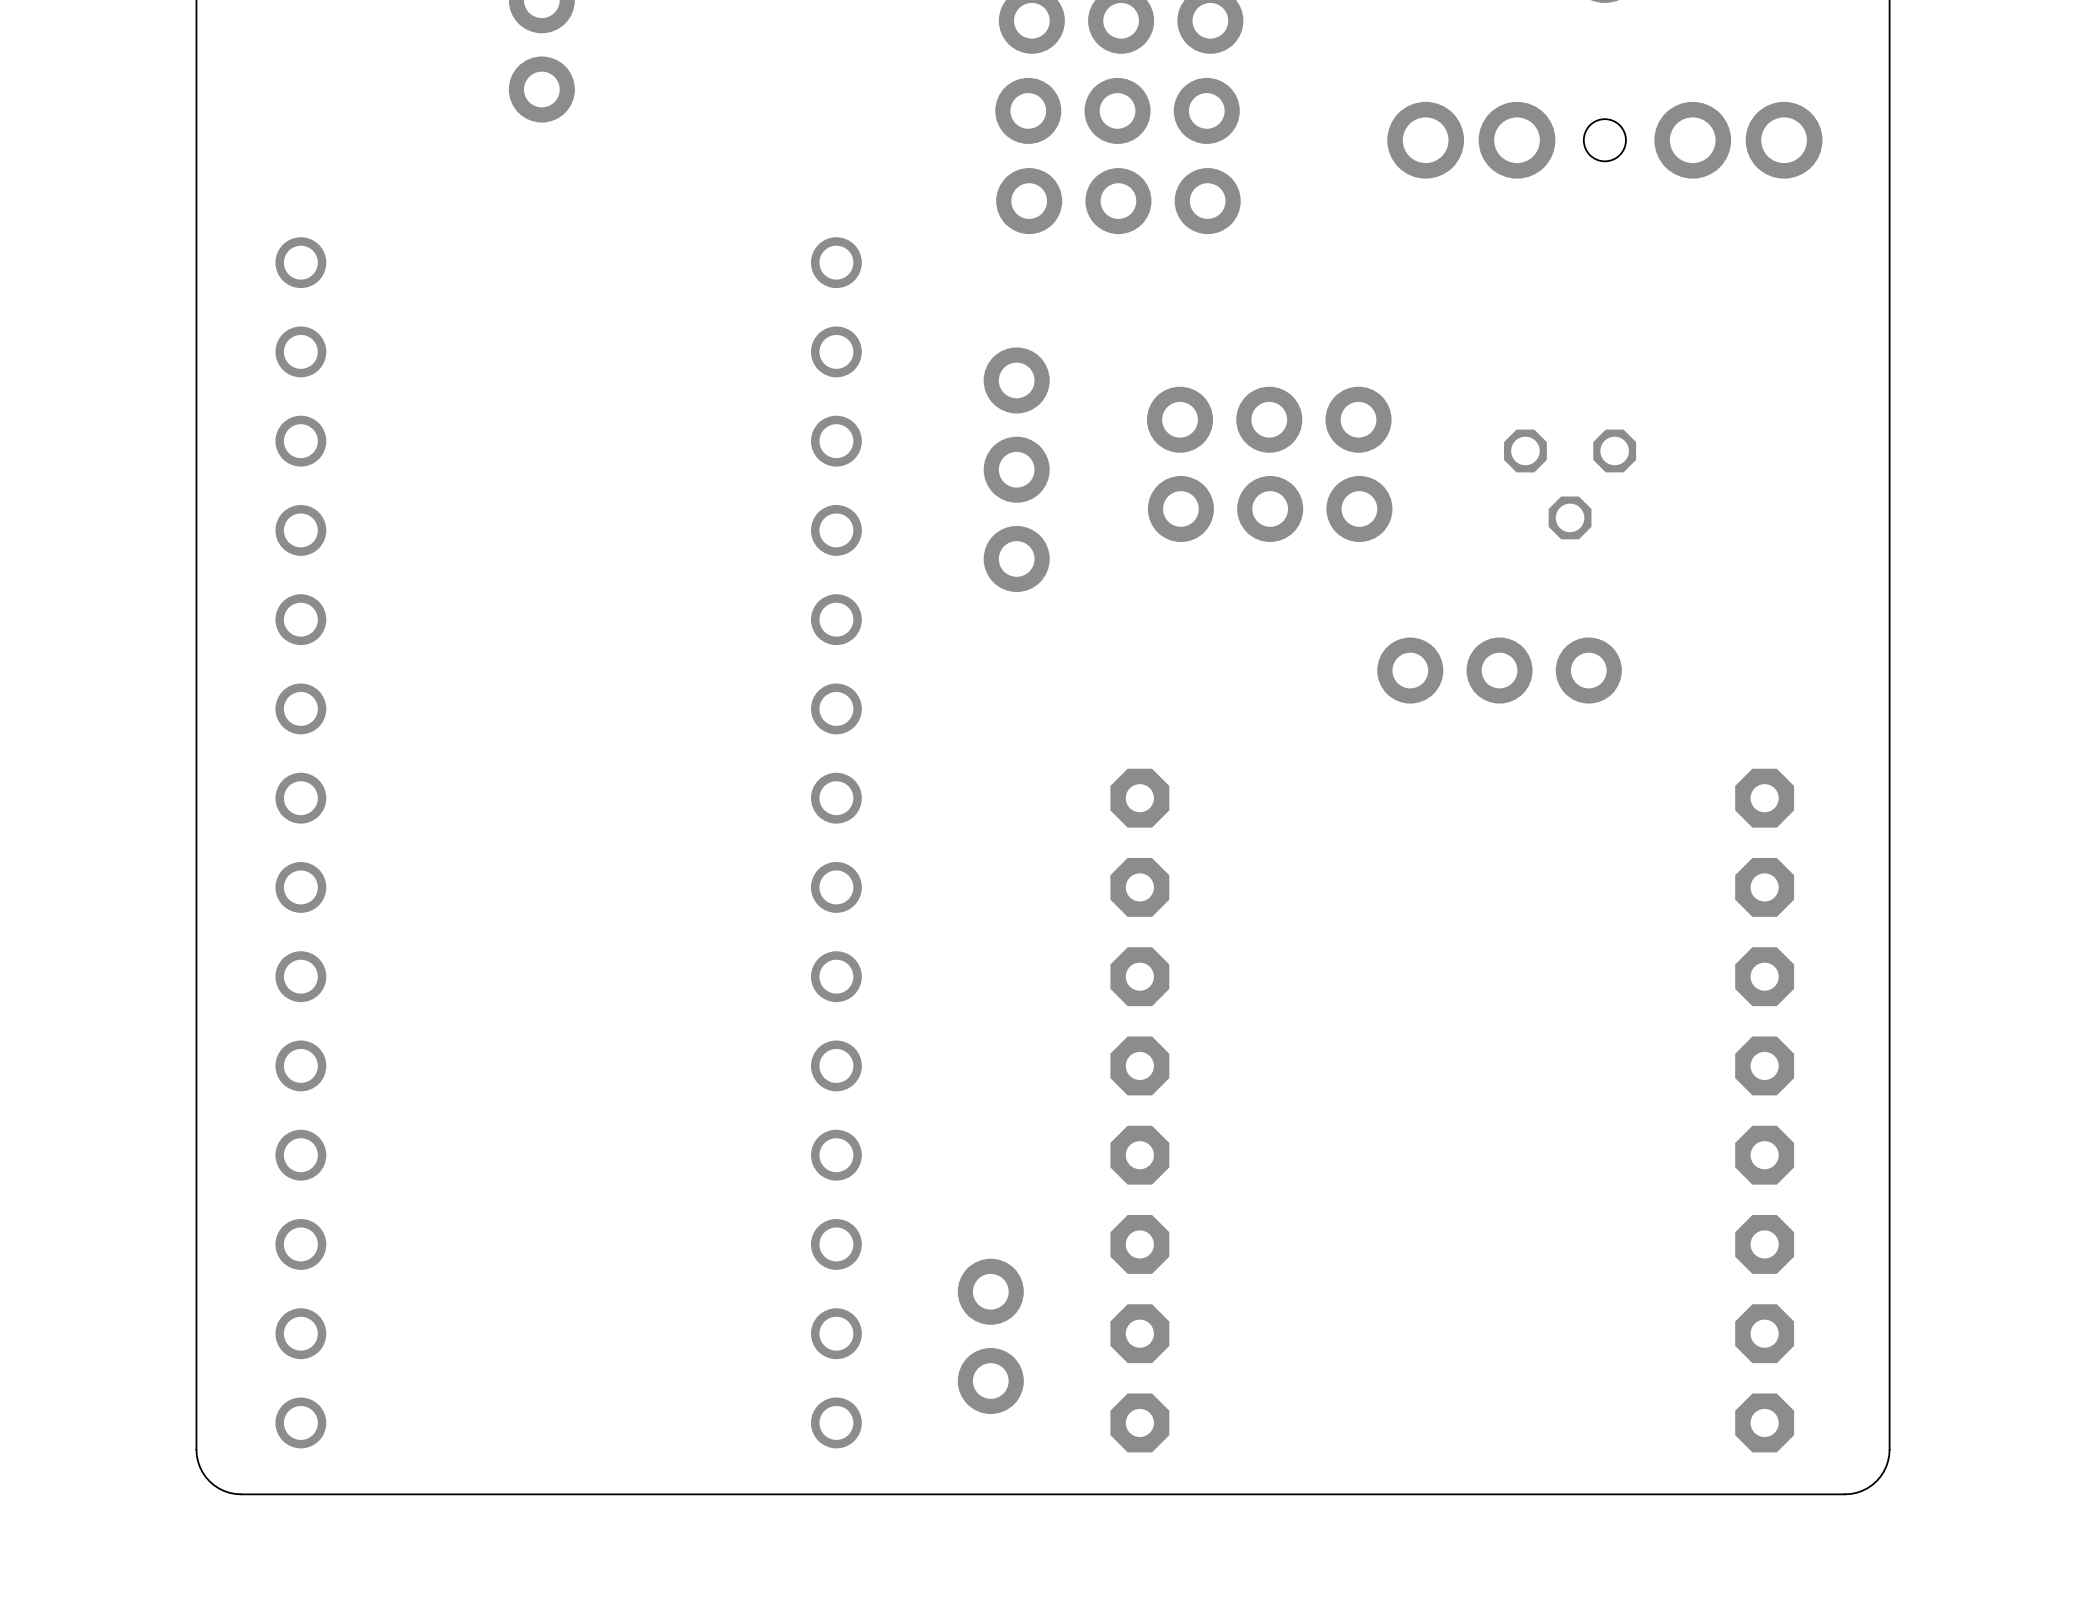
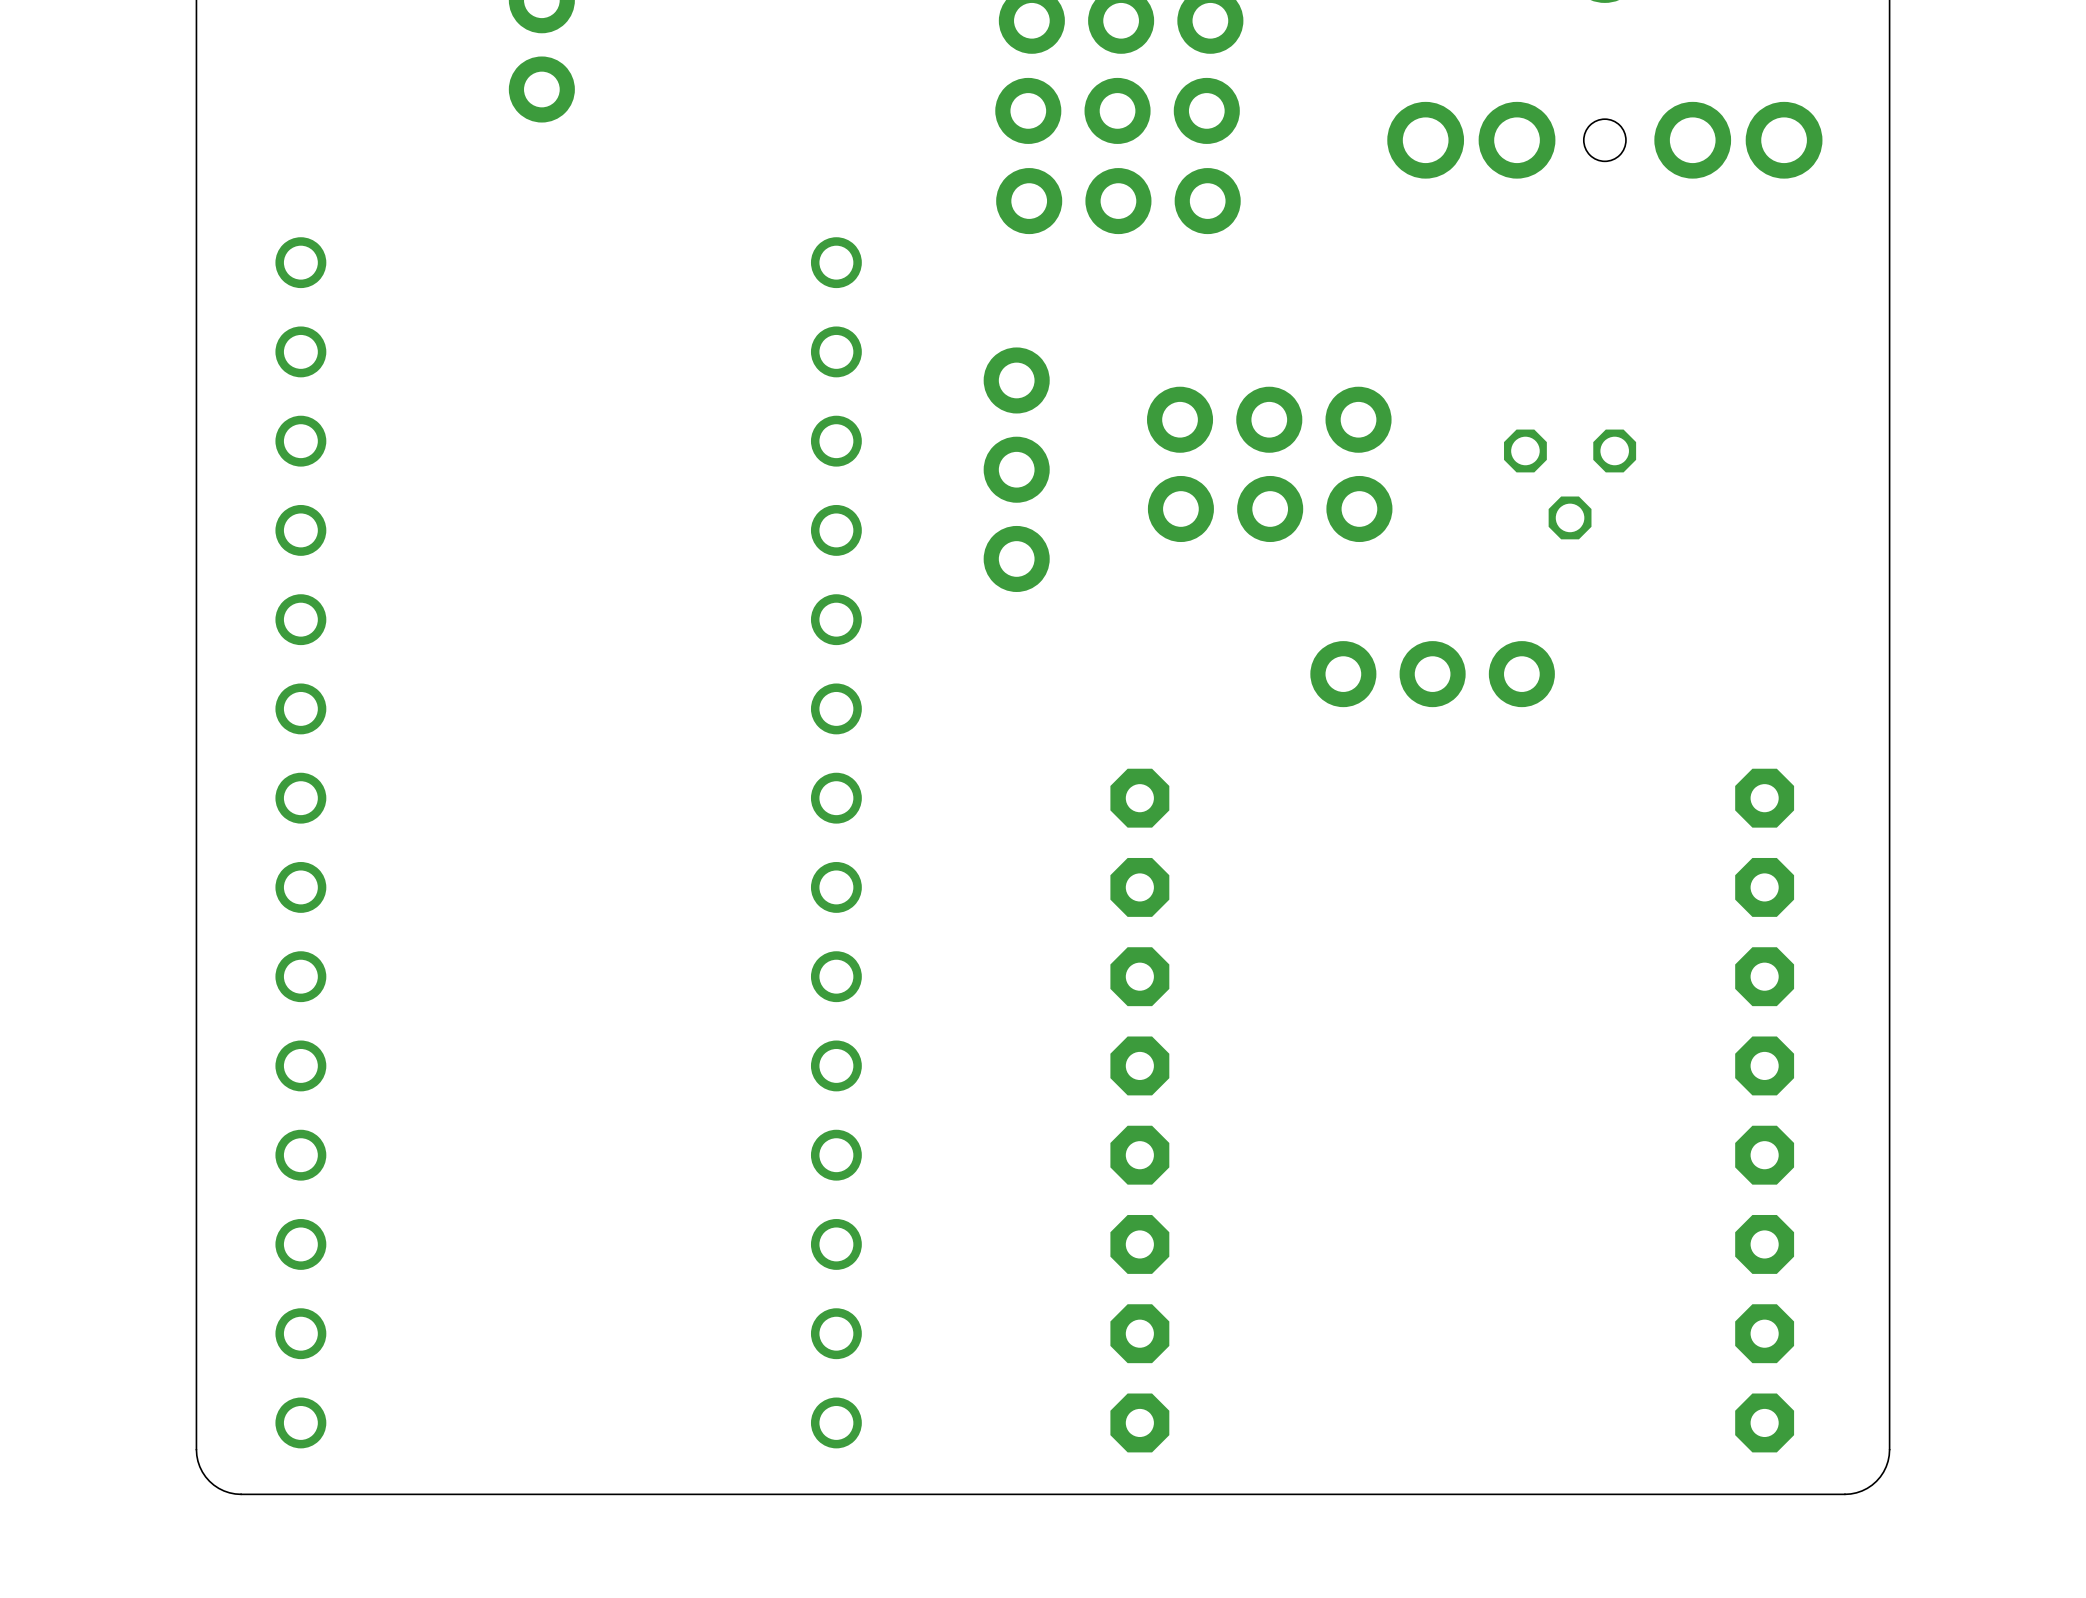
part position: (1499, 670) -> (1432, 674)
part: (990, 1336) -> none

